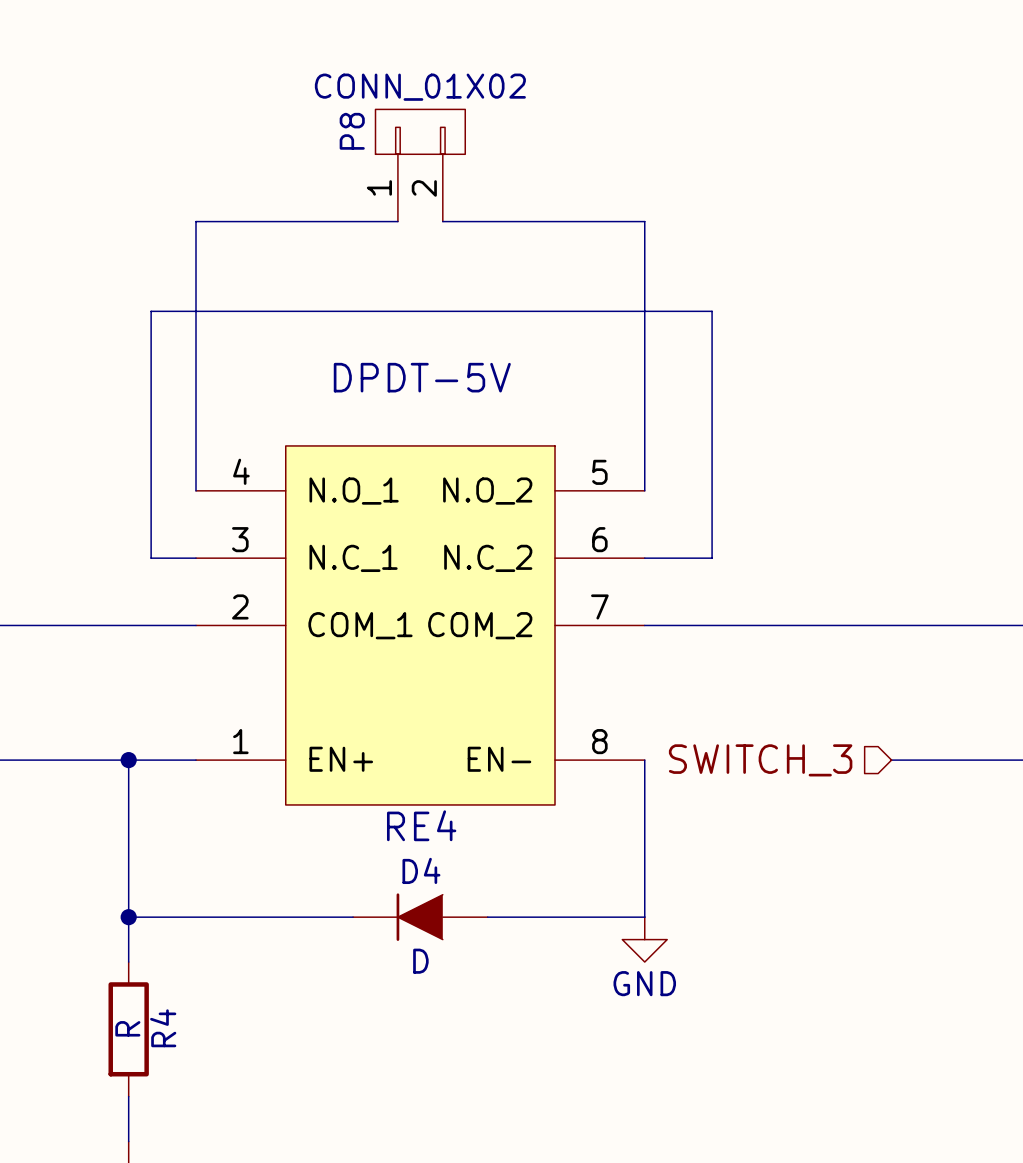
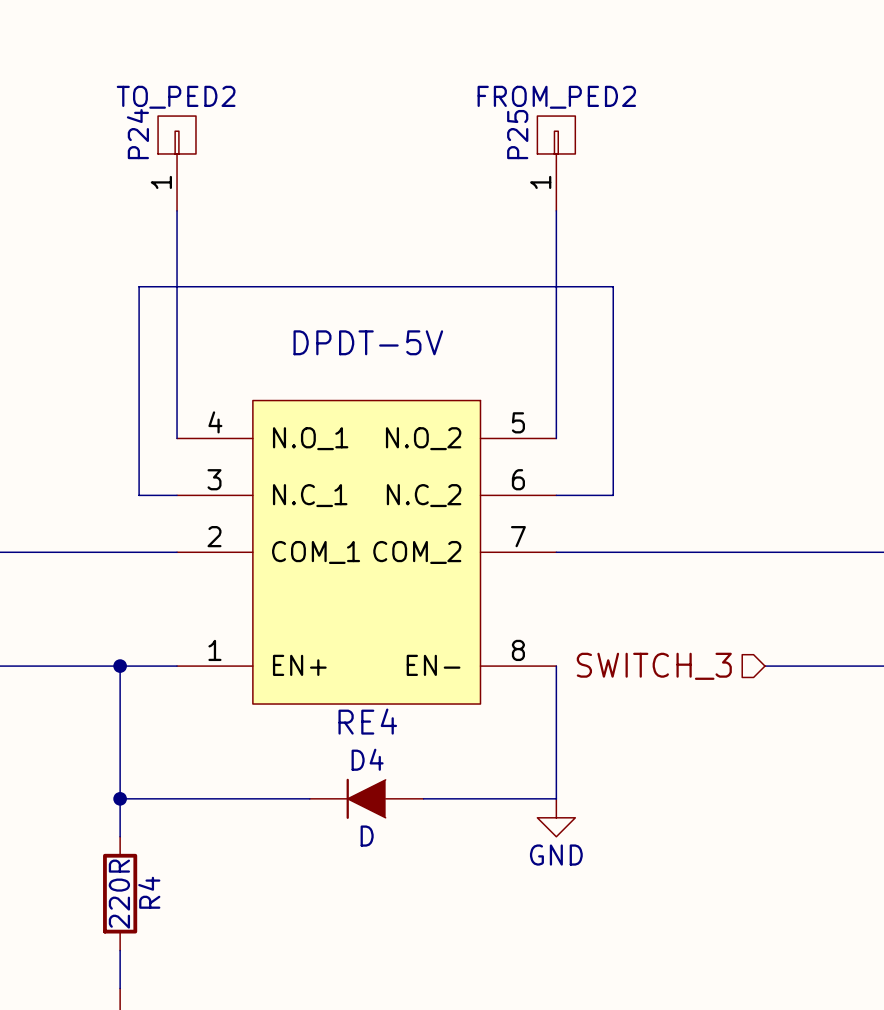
P24: none -> TO_PED2 (177, 163)
P8: CONN_01X02 (420, 165) -> none
P25: none -> FROM_PED2 (556, 163)
wire: (196, 221) (397, 221) -> none
wire: (442, 221) (644, 221) -> none
R4 value: R (127, 1028) -> 220R (119, 894)

